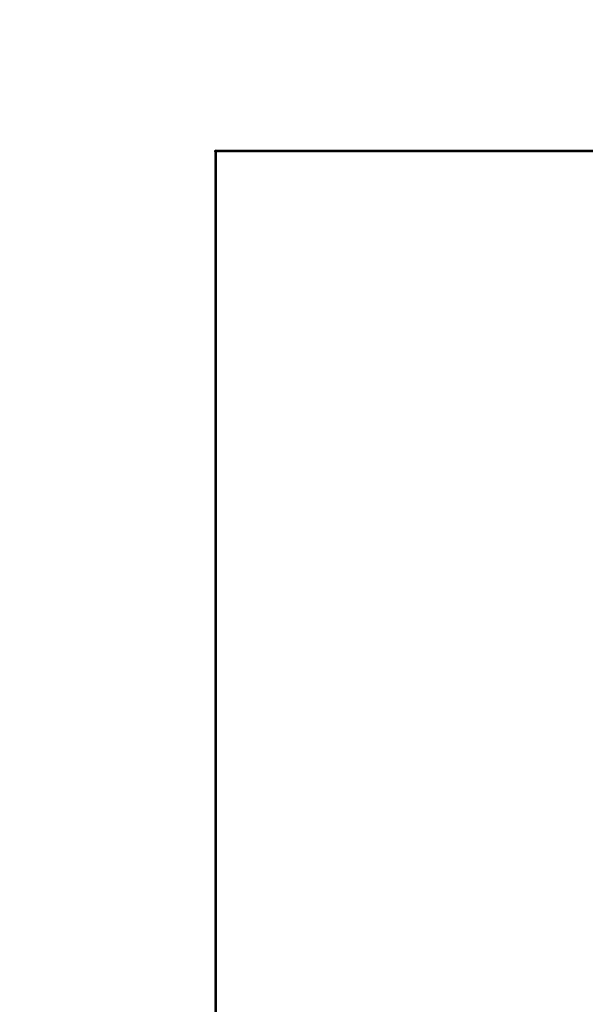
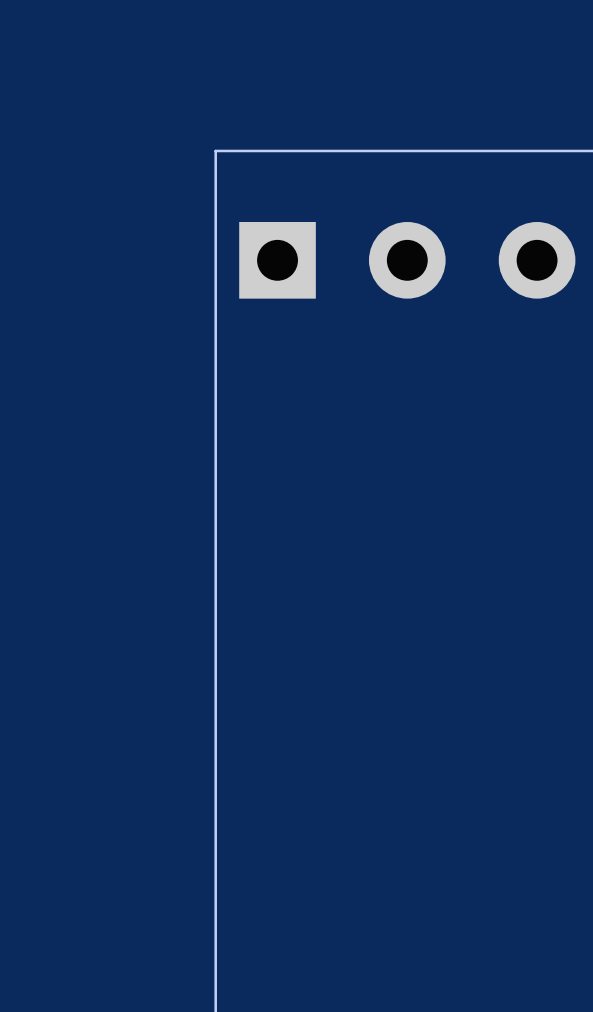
part: none -> (407, 260)

